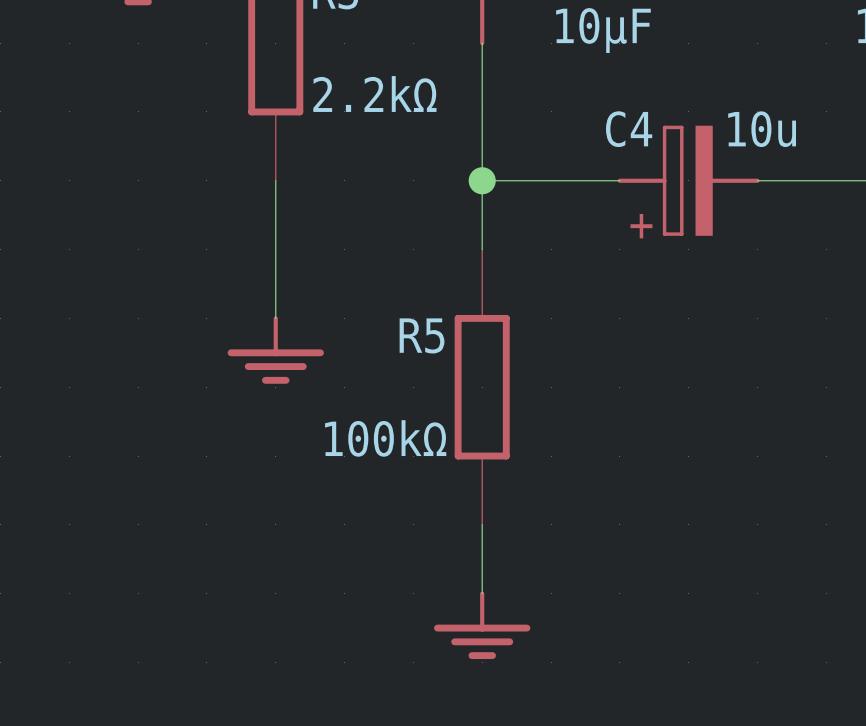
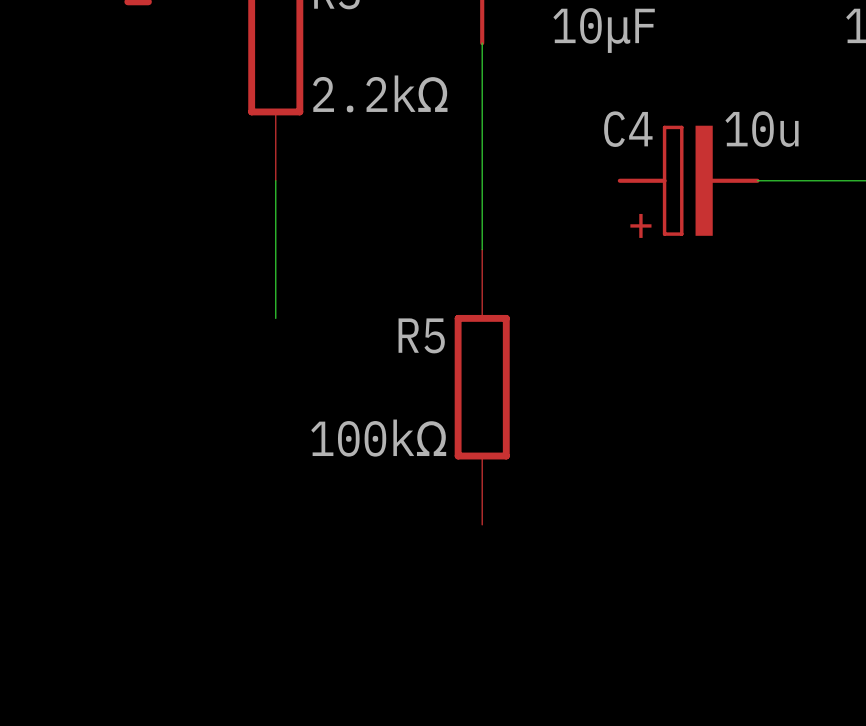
wire: (482, 180) (619, 180) -> none
junction: (482, 180) -> none
power symbol: (275, 350) -> none
wire: (482, 524) (482, 593) -> none
power symbol: (482, 625) -> none

